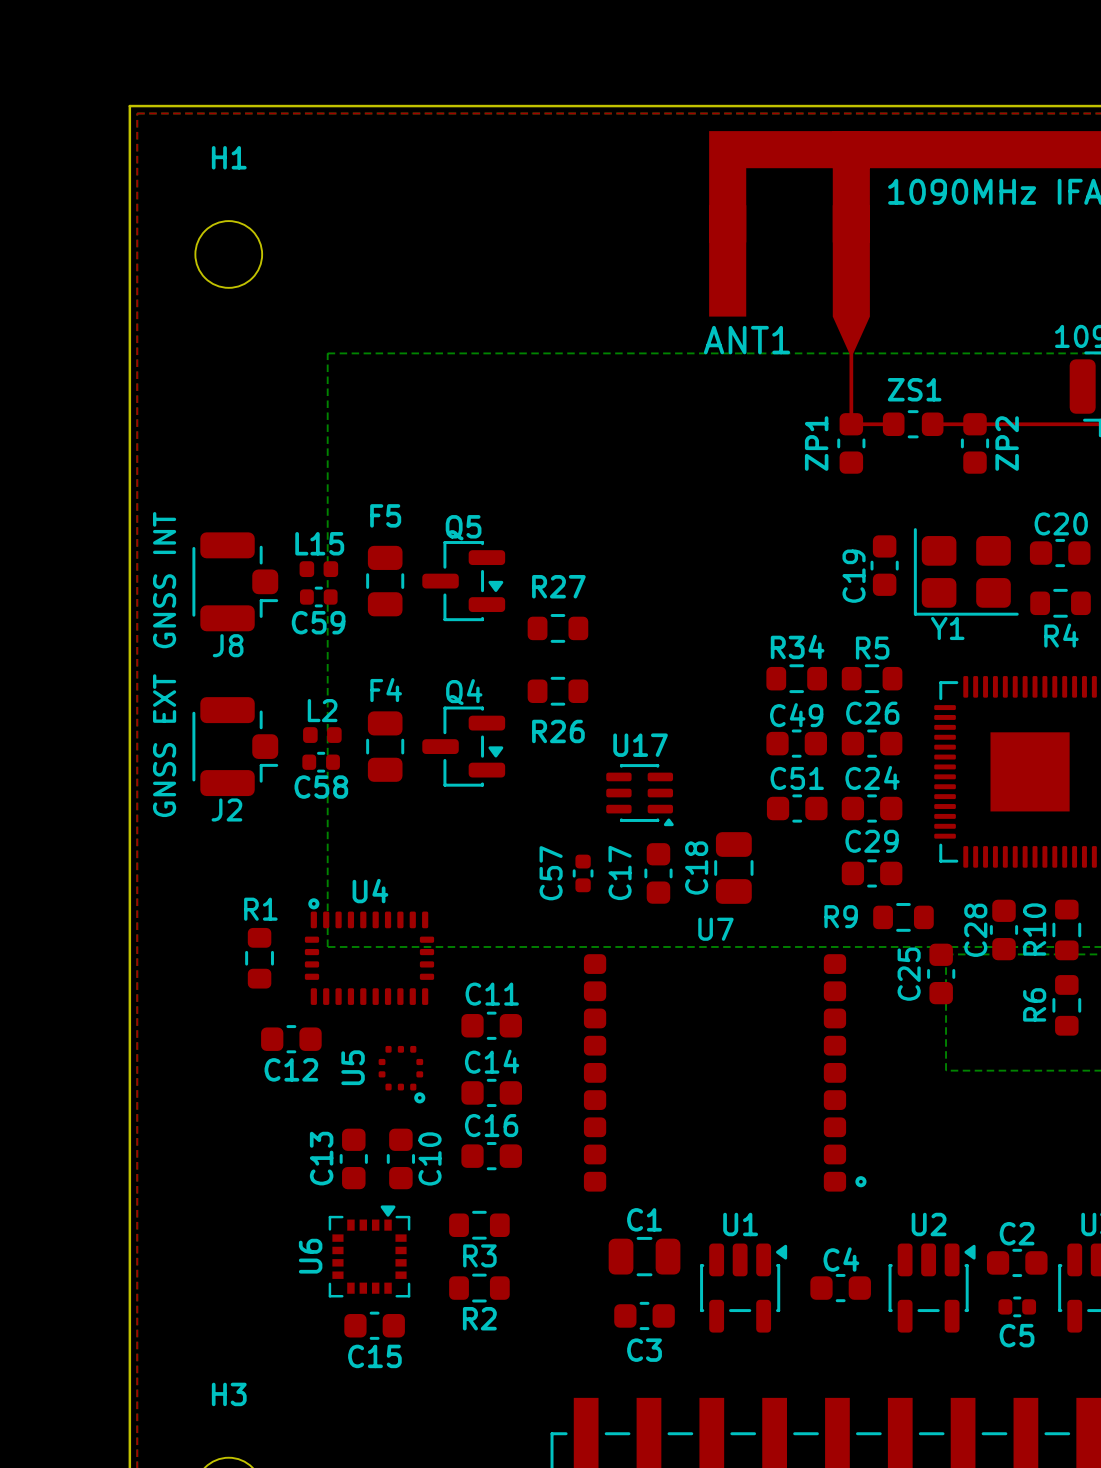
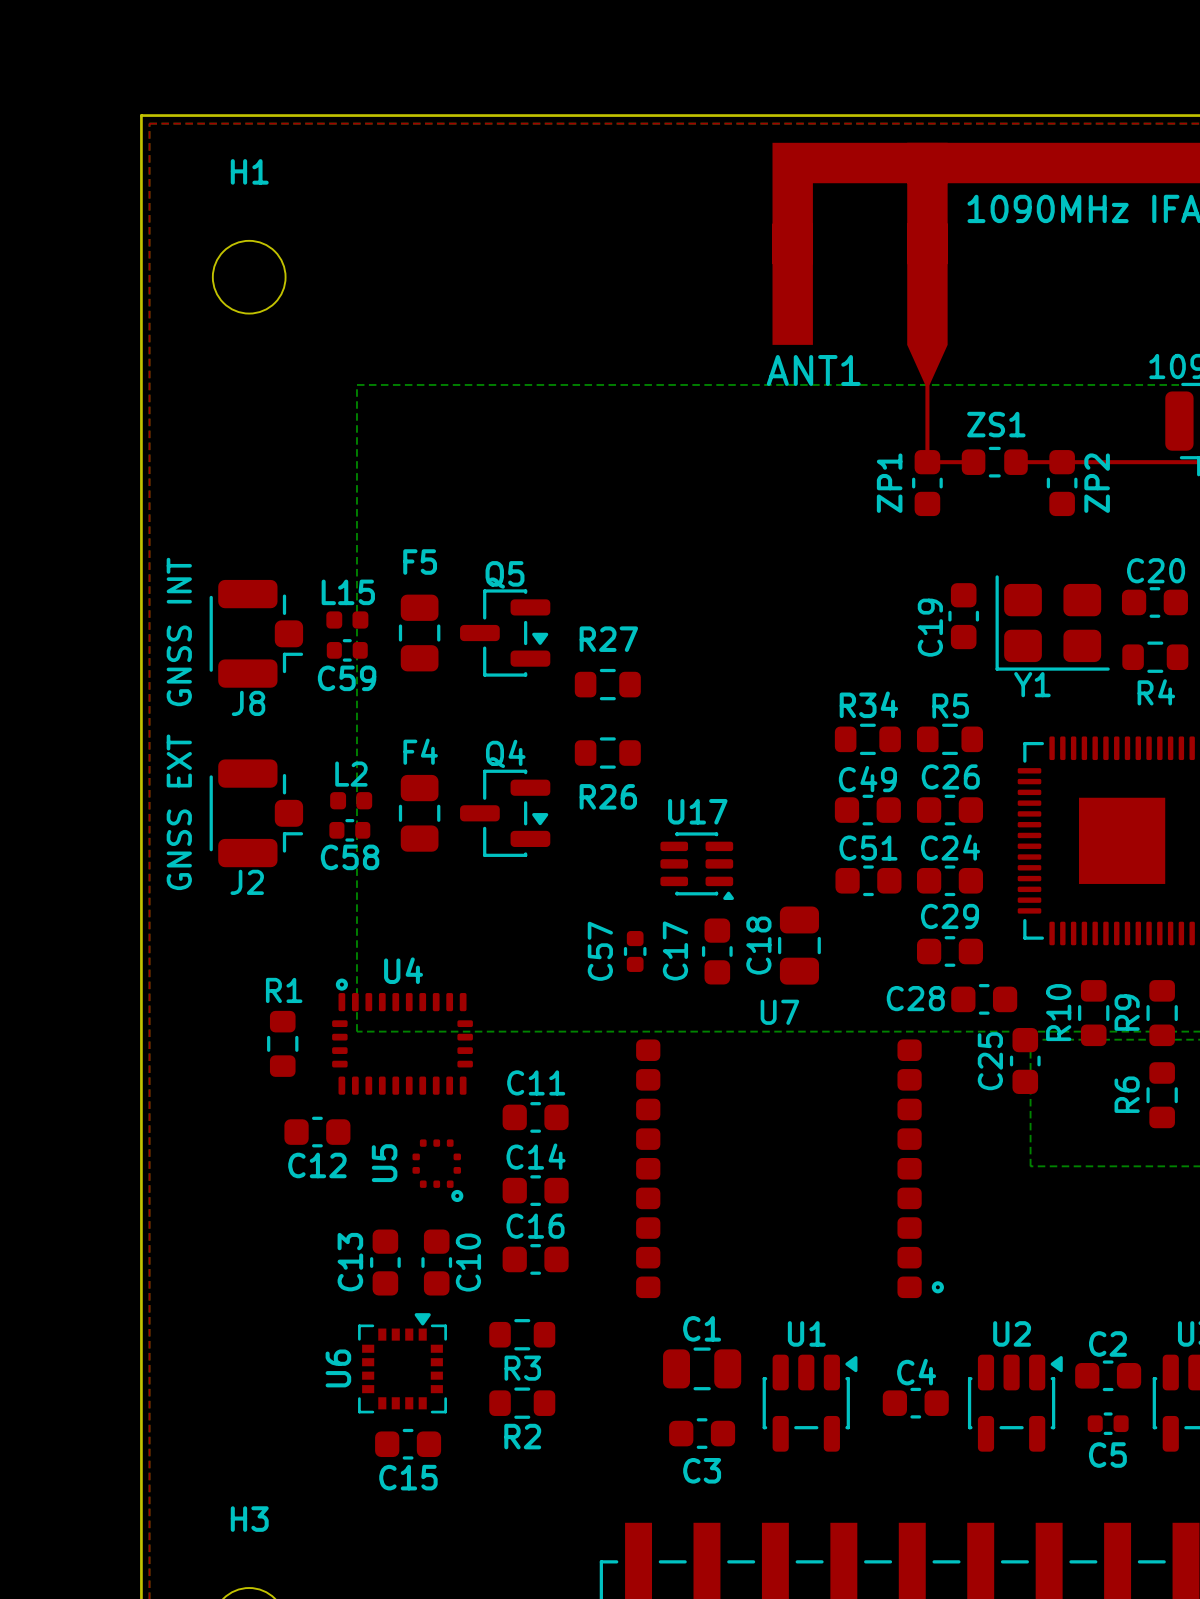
R9: (903, 917) -> none
C28 rotation: 0° (1003, 929) -> 90° clockwise (984, 999)
C28 position: (1003, 929) -> (984, 999)
R10: none -> (1093, 1013)
R10 name: R10 (1034, 929) -> R9 (1127, 1012)

